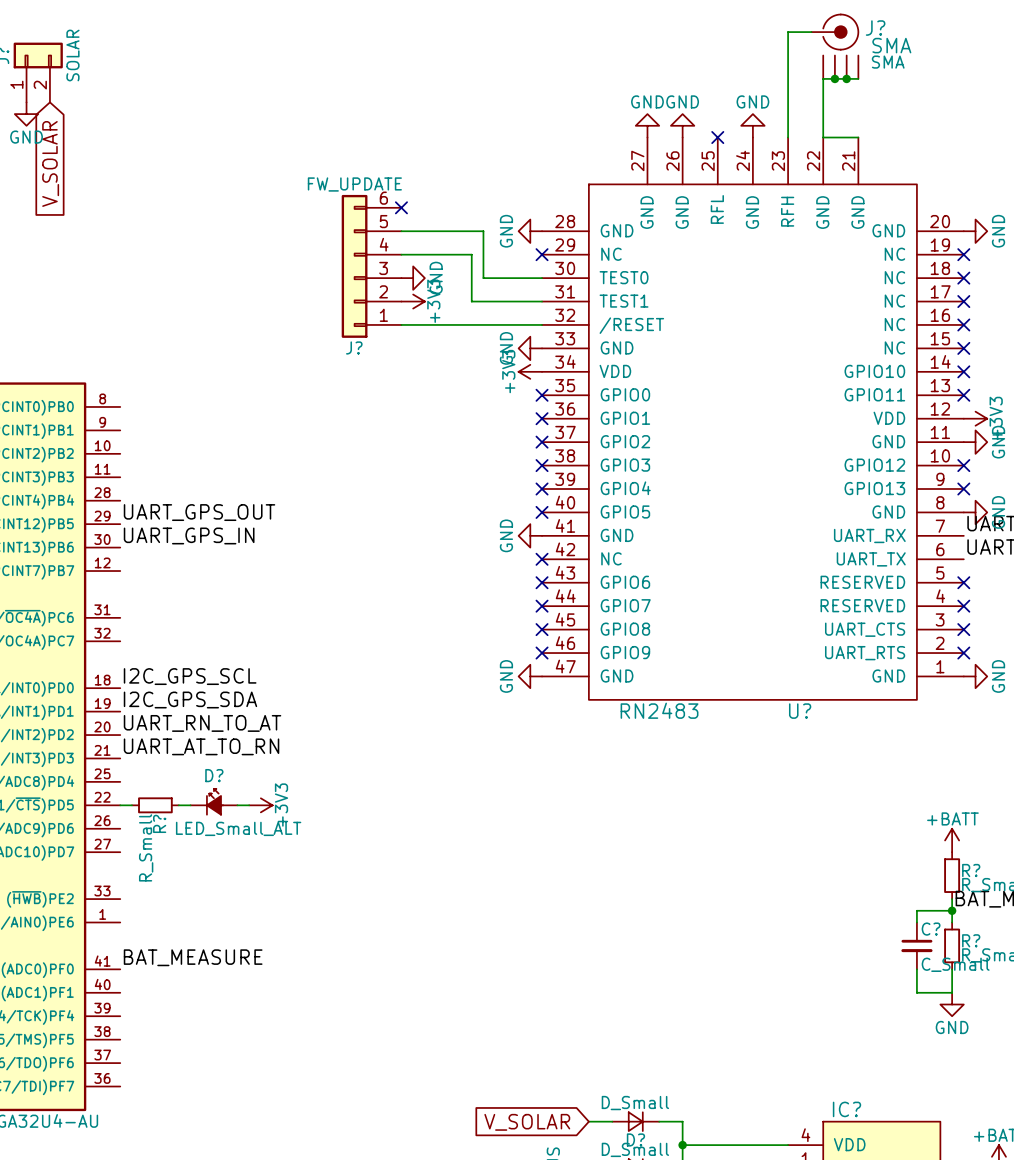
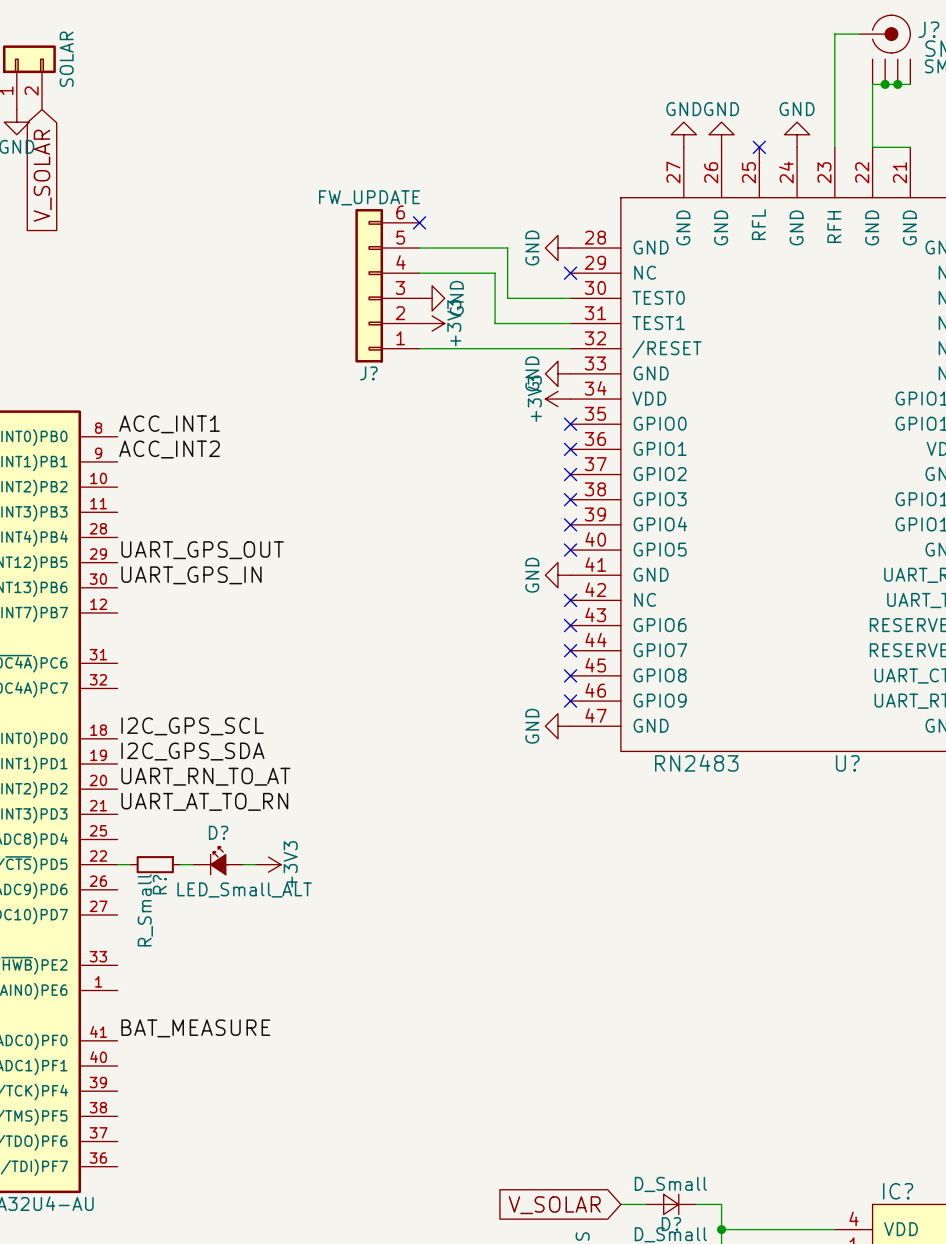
label: none -> ACC_INT1 (169, 424)
label: none -> ACC_INT2 (169, 449)

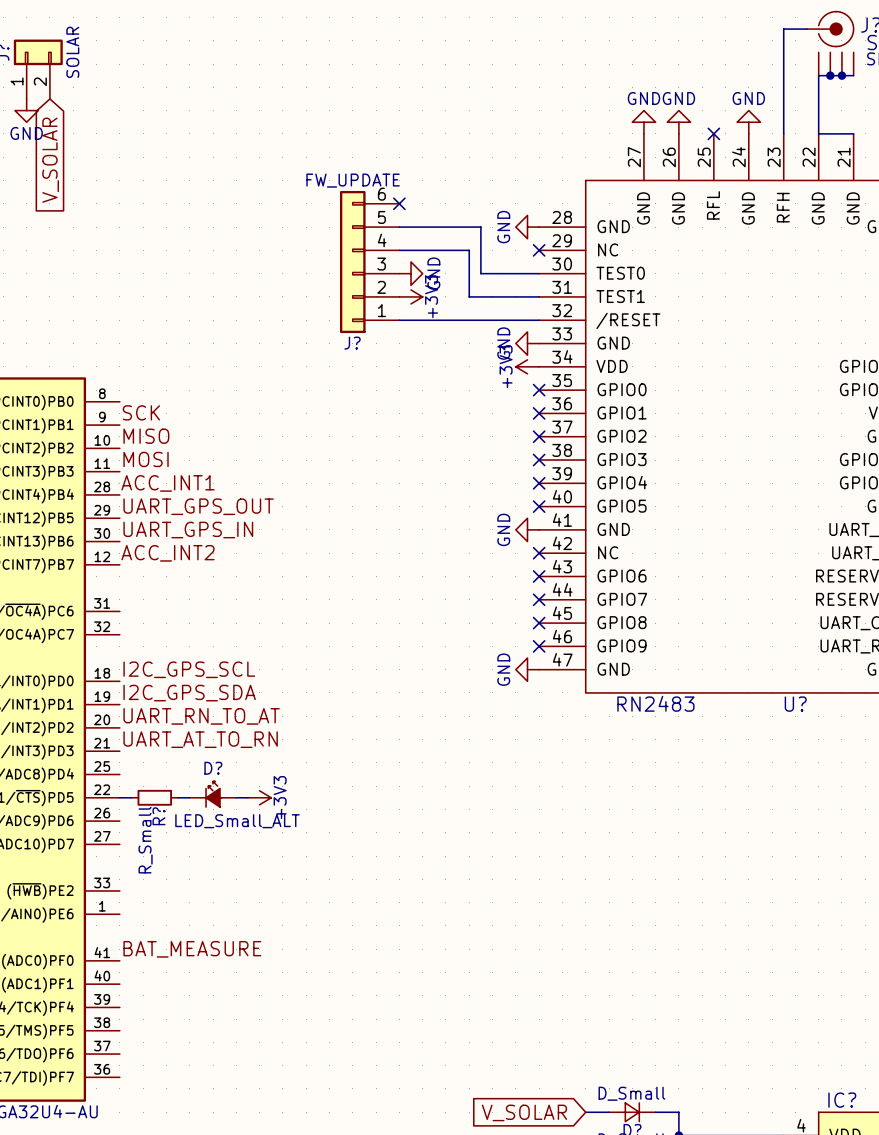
label position: ACC_INT1 (169, 424) -> ACC_INT1 (168, 483)
label: ACC_INT2 (169, 449) -> SCK (141, 412)
label: none -> MISO (146, 436)
label: none -> MOSI (146, 459)
label: none -> ACC_INT2 (168, 553)

